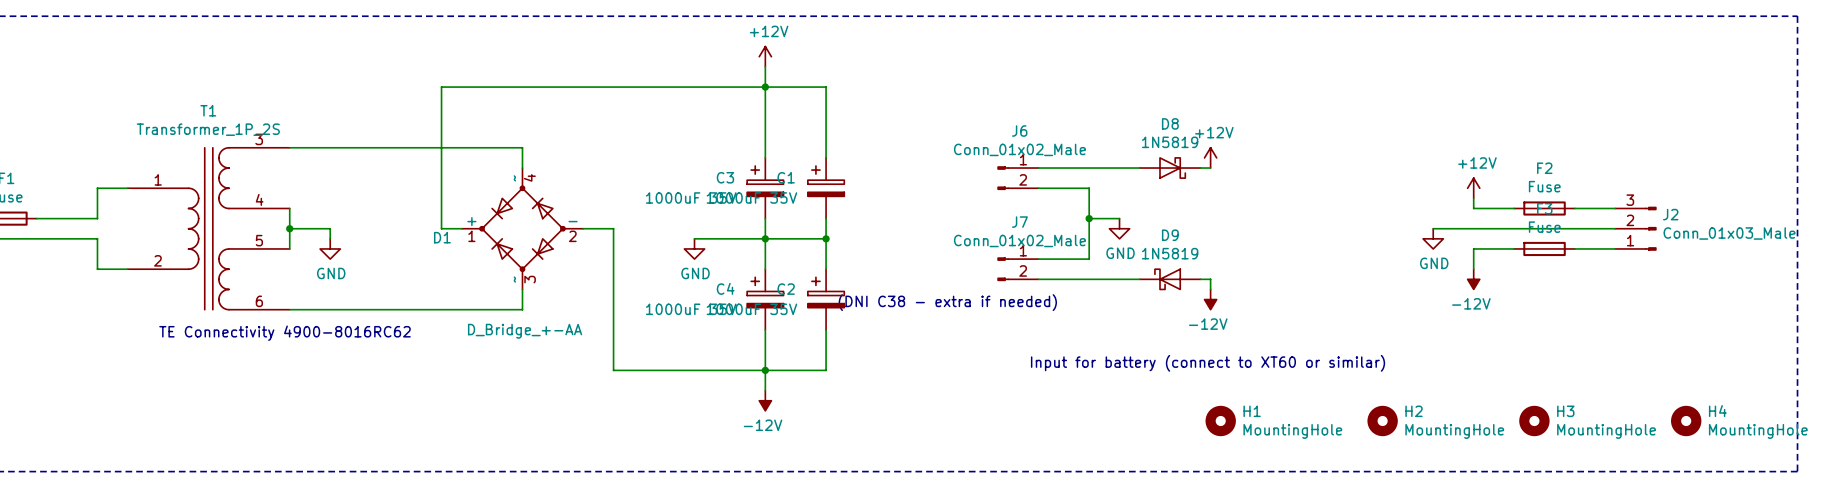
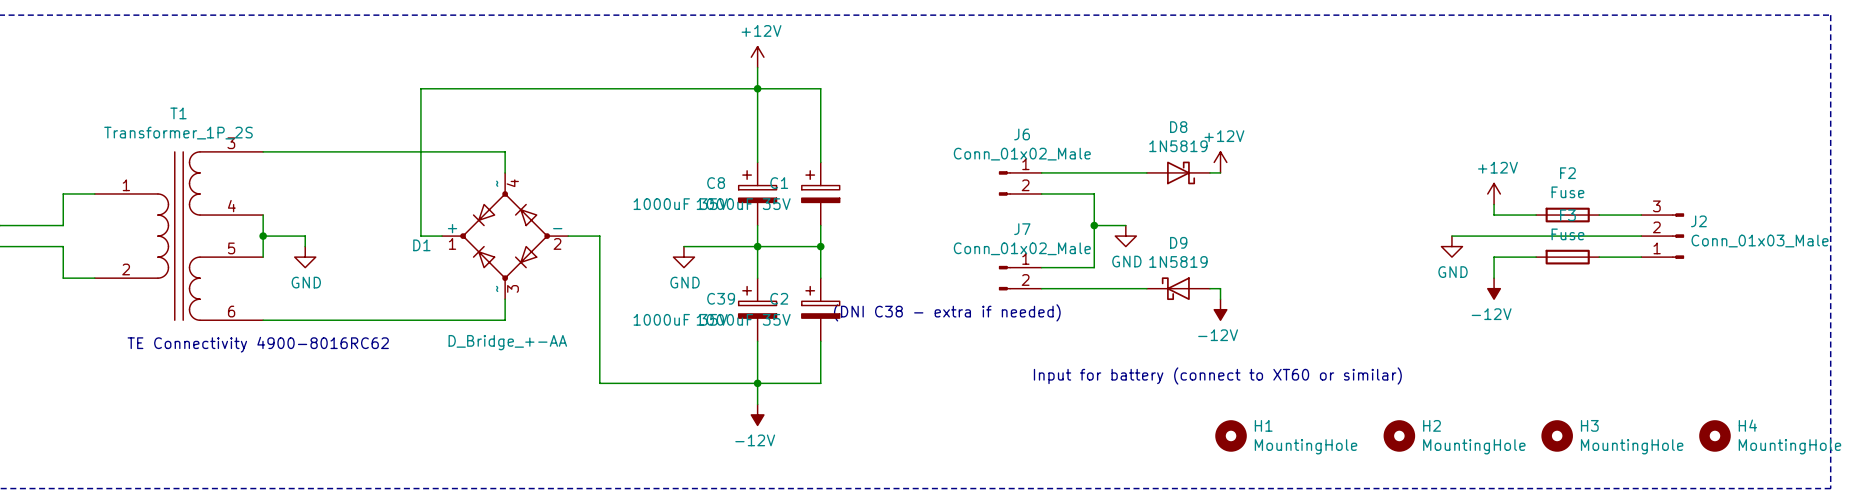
C3 name: C3 (725, 177) -> C8 (716, 183)
C4 name: C4 (725, 288) -> C39 (721, 298)

